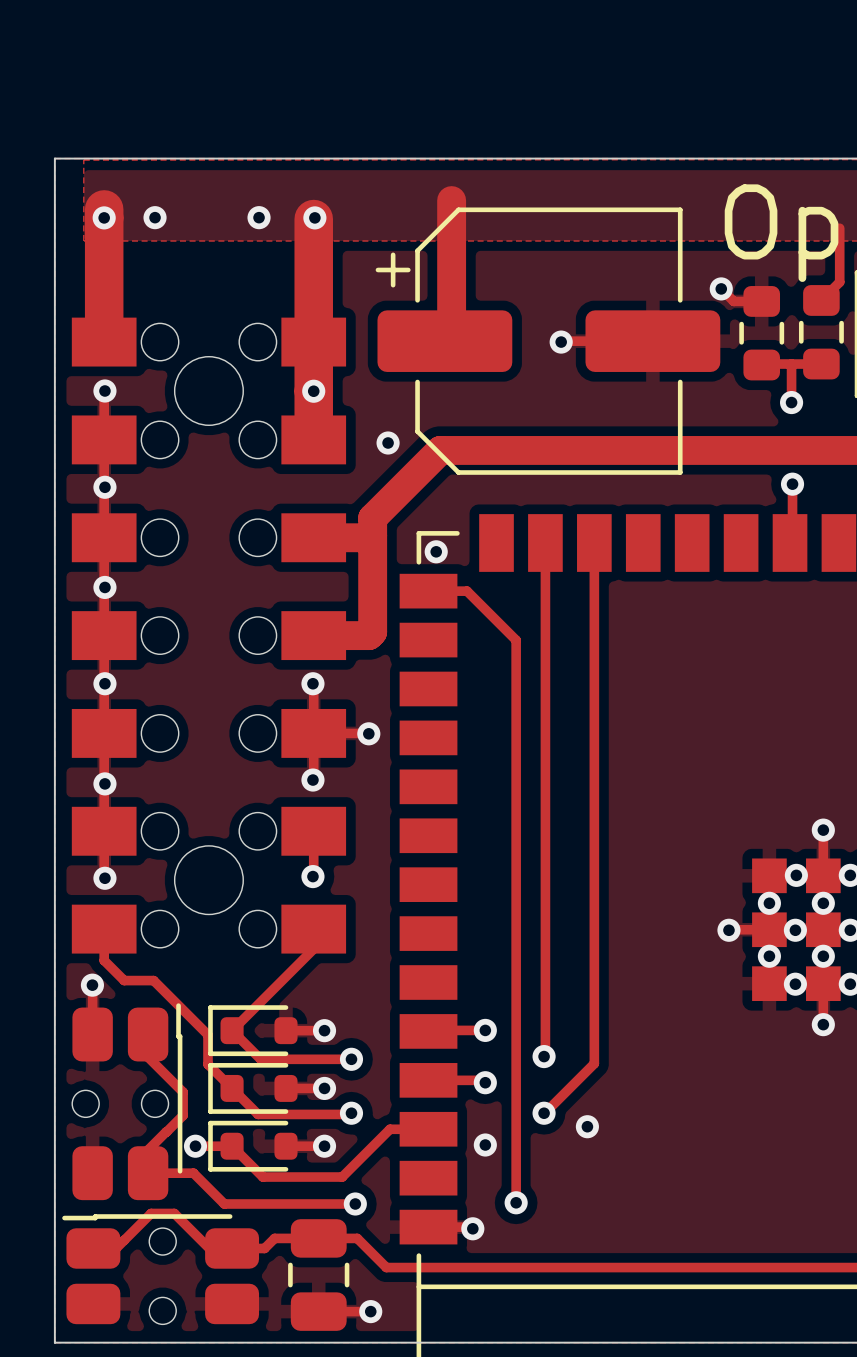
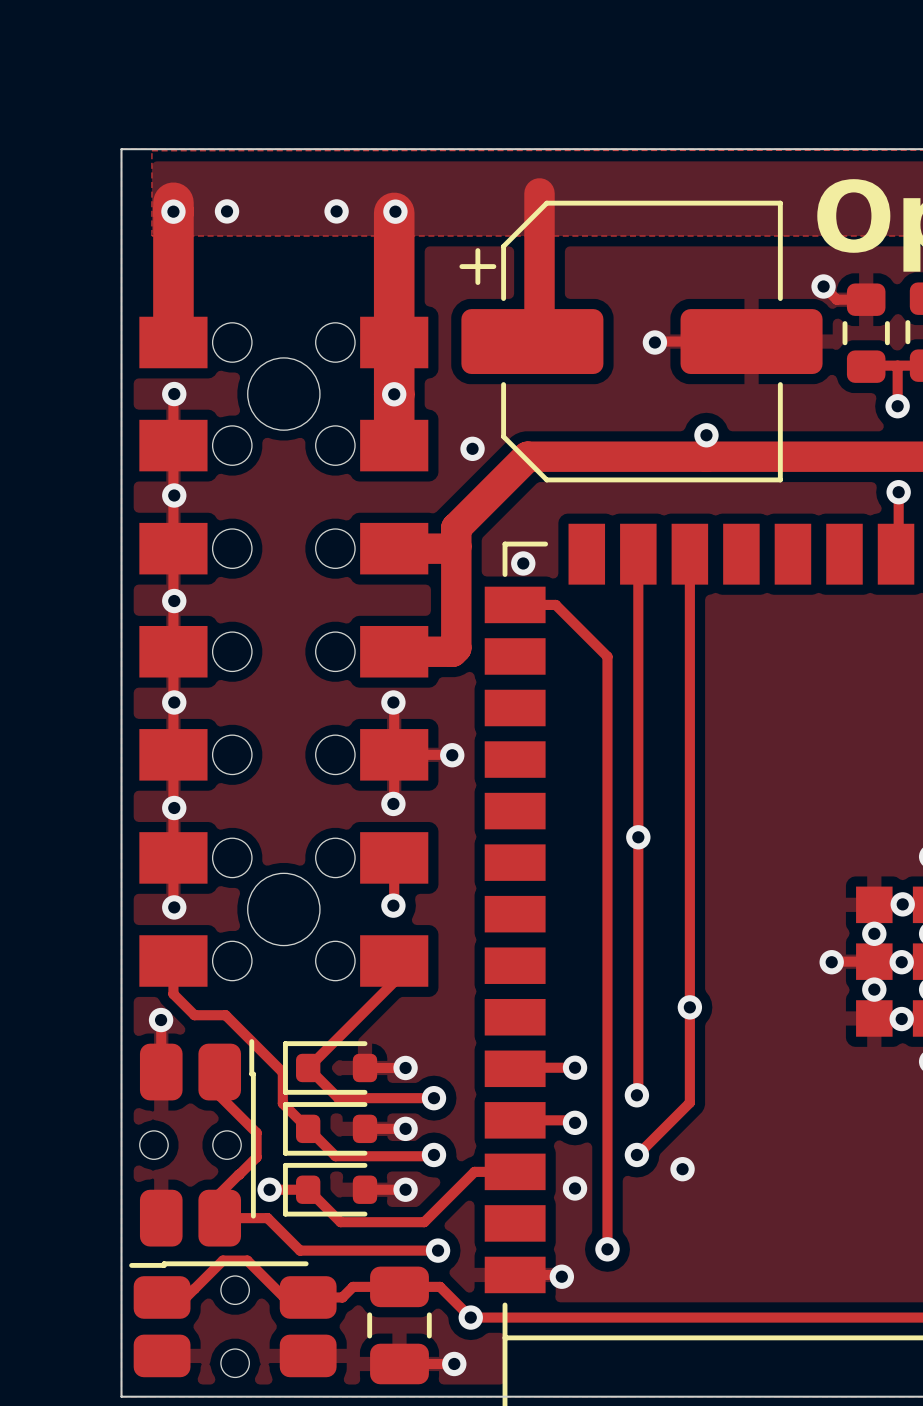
via: none -> (706, 435)
via: none -> (638, 837)
via: none -> (689, 1007)
via: none -> (470, 1317)

